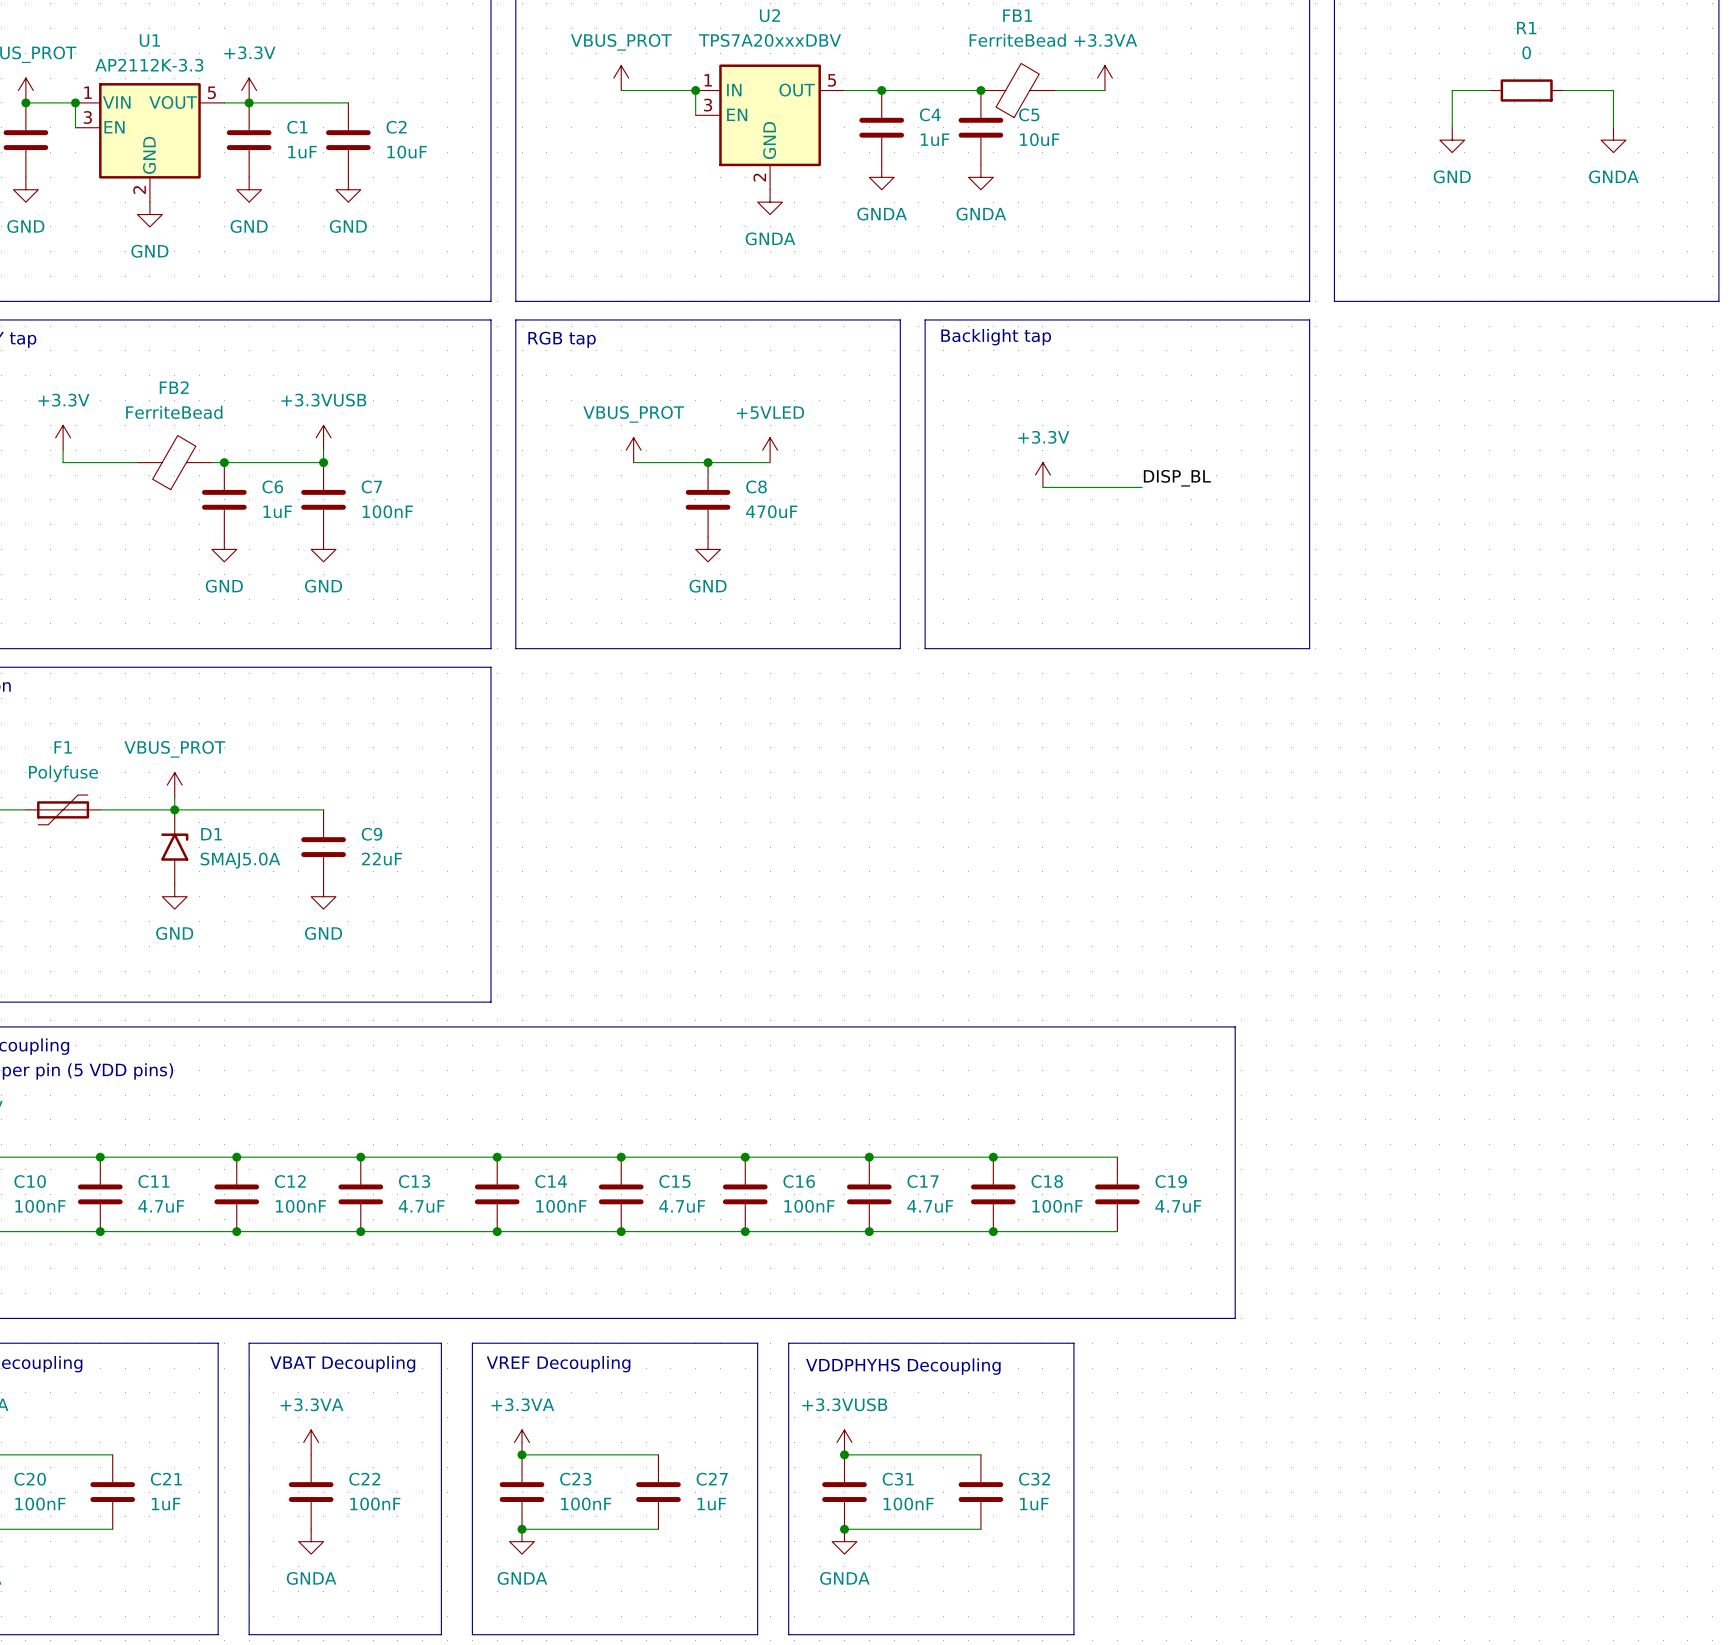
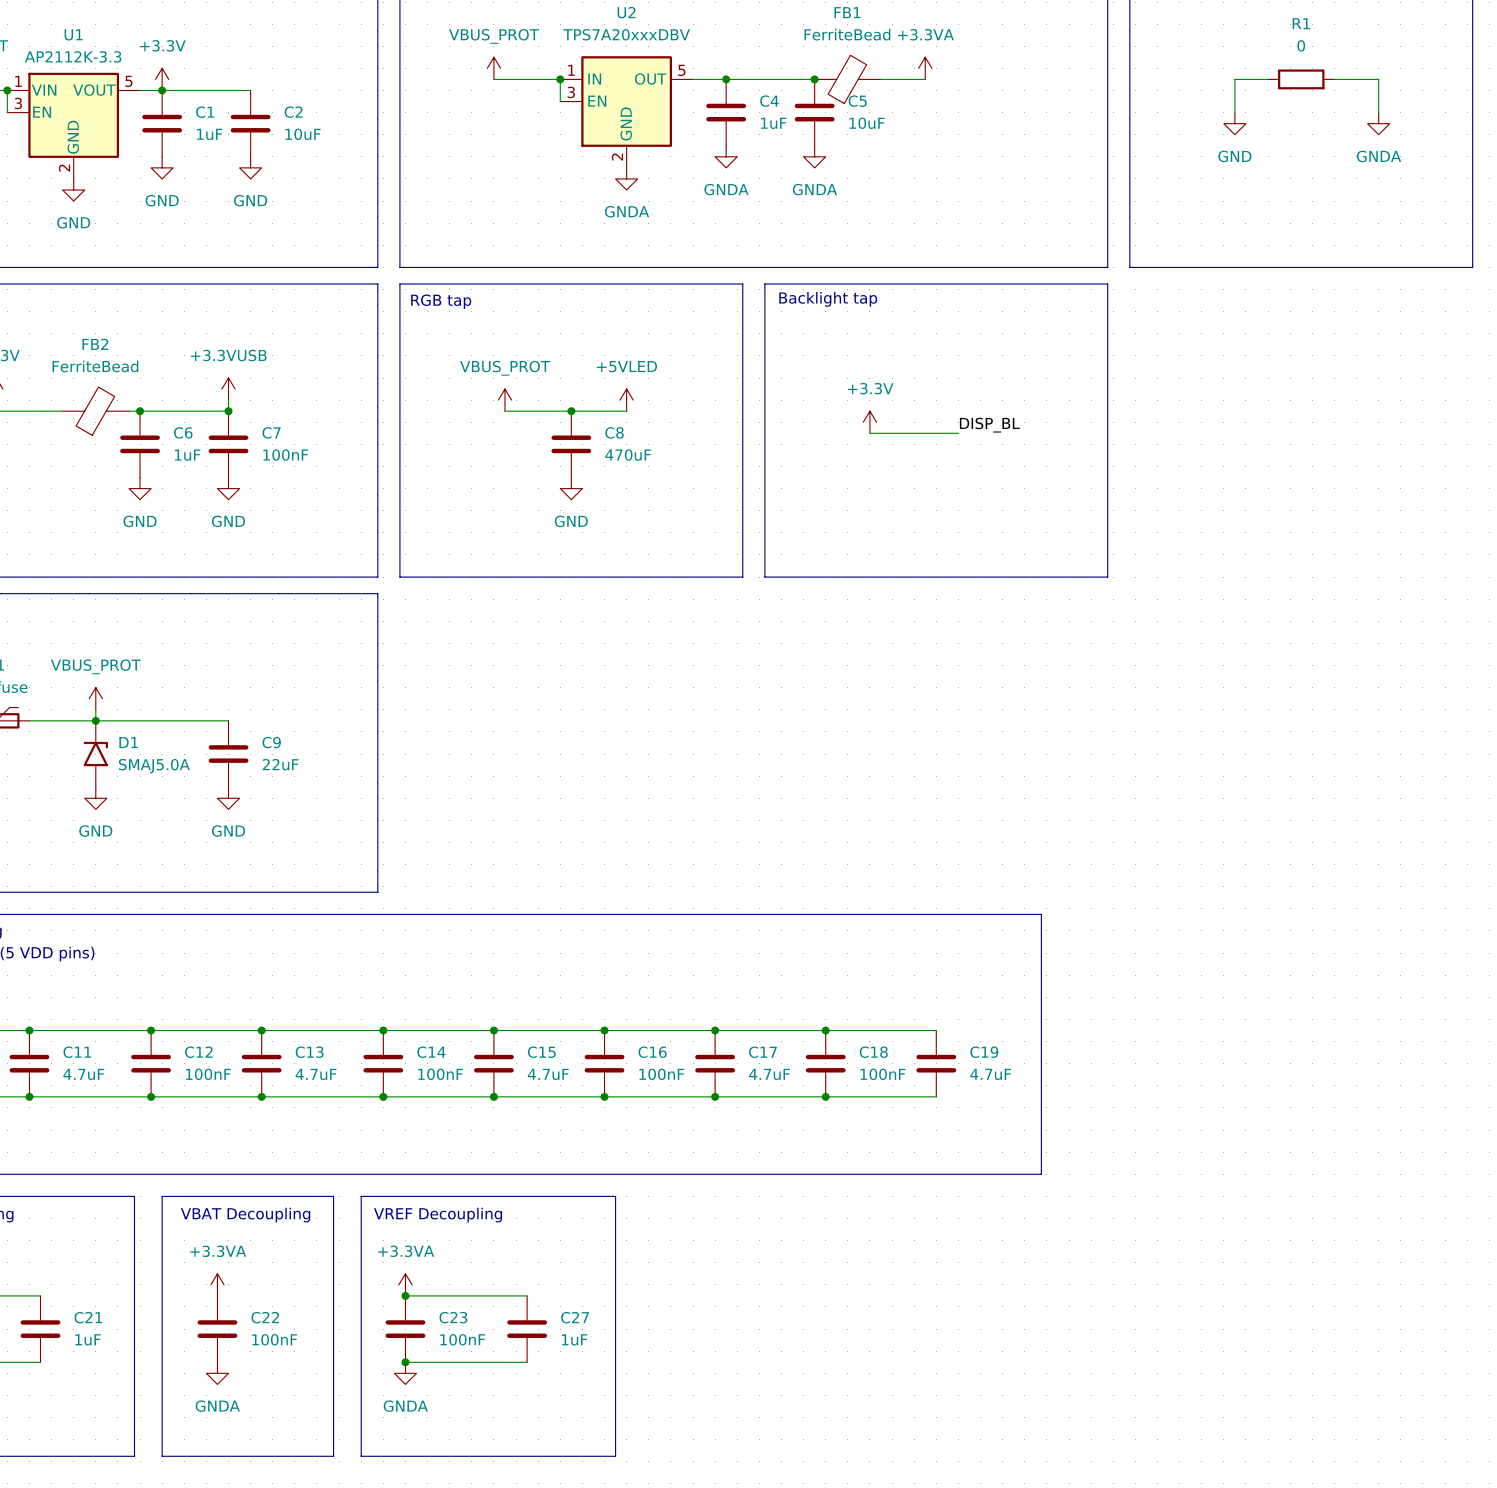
line: (788, 1343) (1073, 1343) (1073, 1634) (788, 1634) (788, 1343) -> none
text: VDDPHYHS Decoupling (903, 1366) -> none
power symbol: +3.3VUSB (844, 1442) -> none
wire: (844, 1454) (980, 1454) -> none
junction: (844, 1454) -> none
C31: 100nF (844, 1492) -> none
C32: 1uF (980, 1492) -> none
wire: (844, 1529) (980, 1529) -> none
junction: (844, 1529) -> none
power symbol: GNDA (844, 1541) -> none

